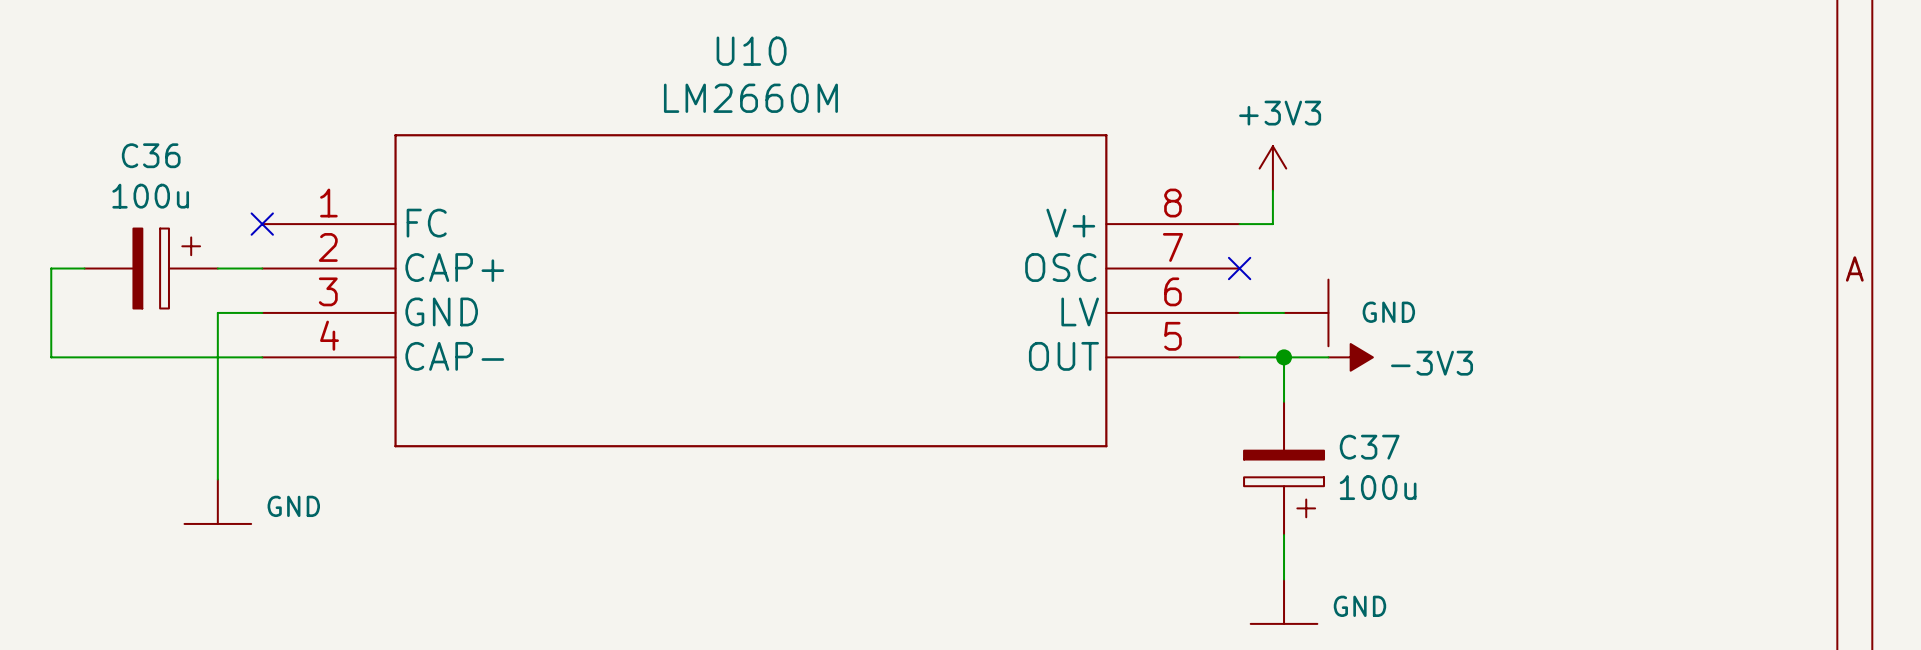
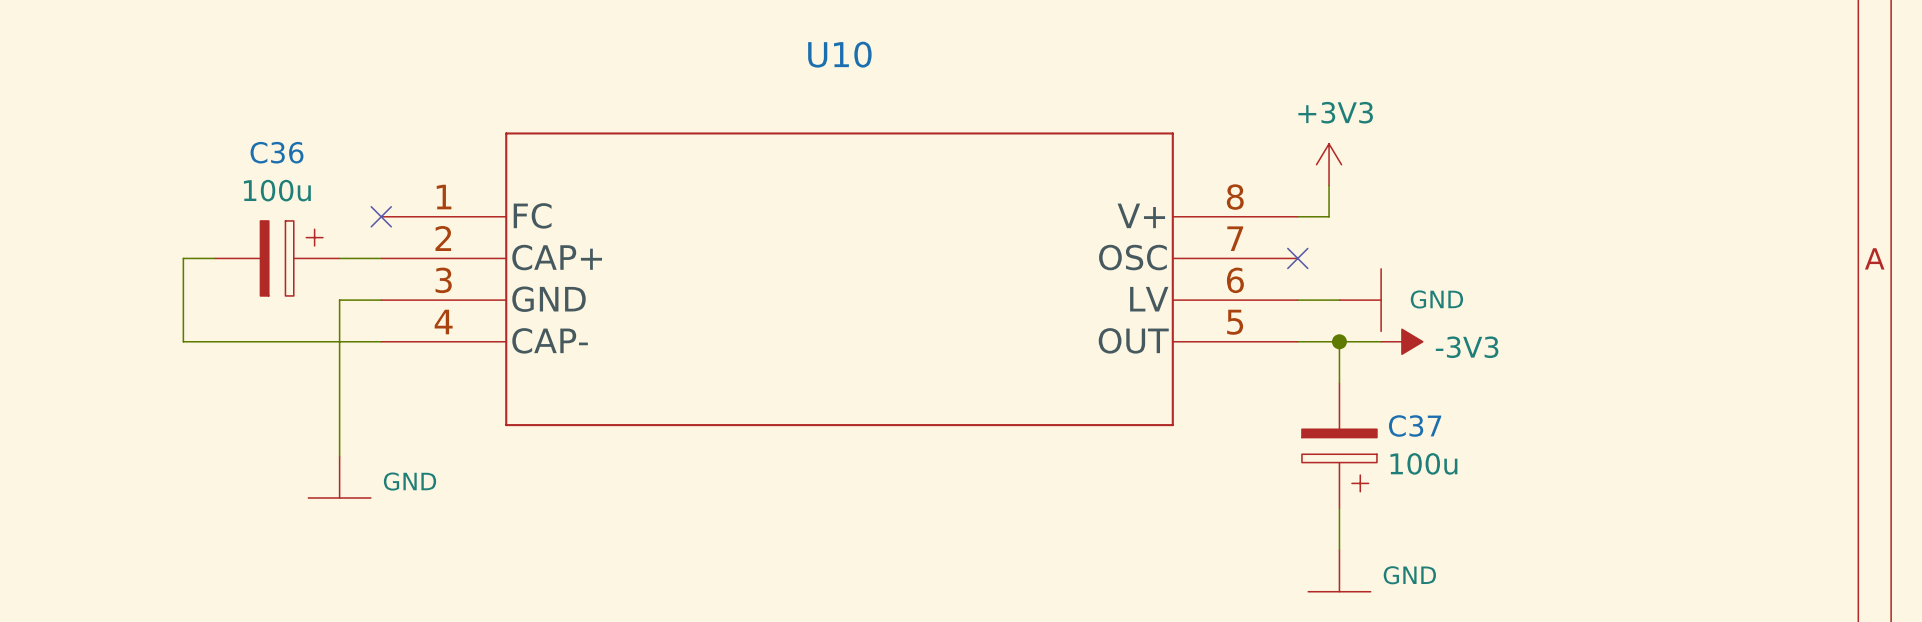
U10 value: LM2660M (750, 98) -> none

